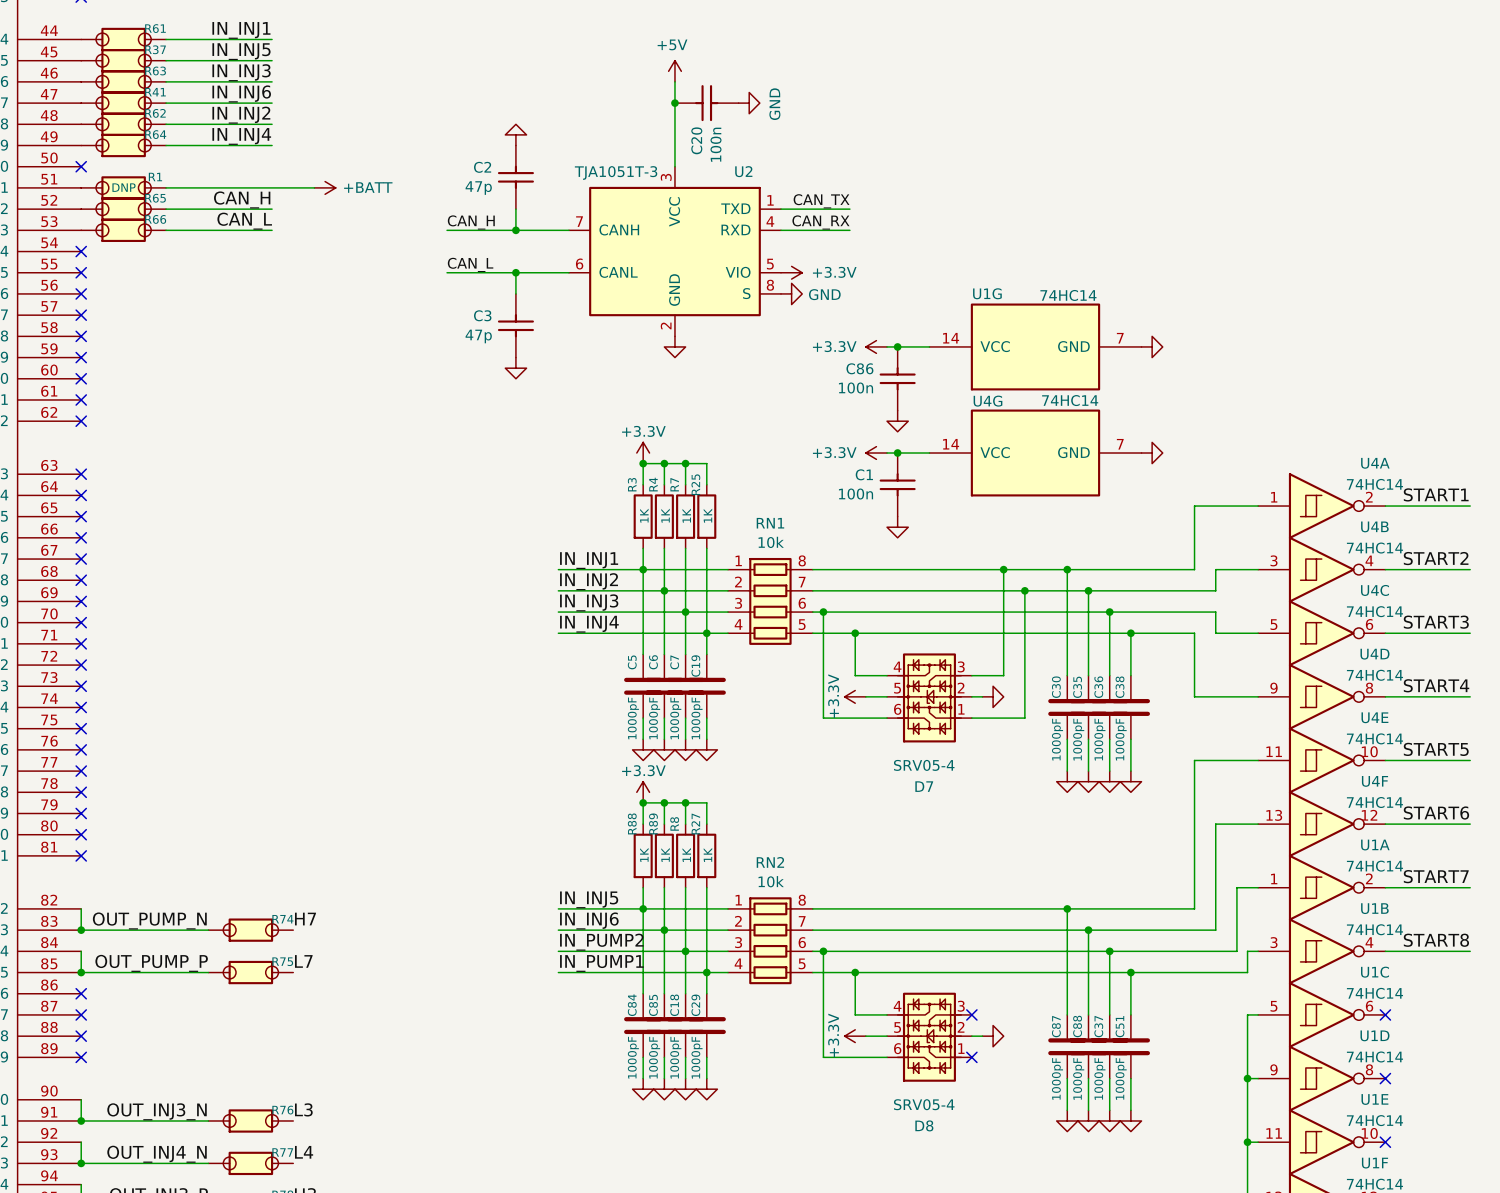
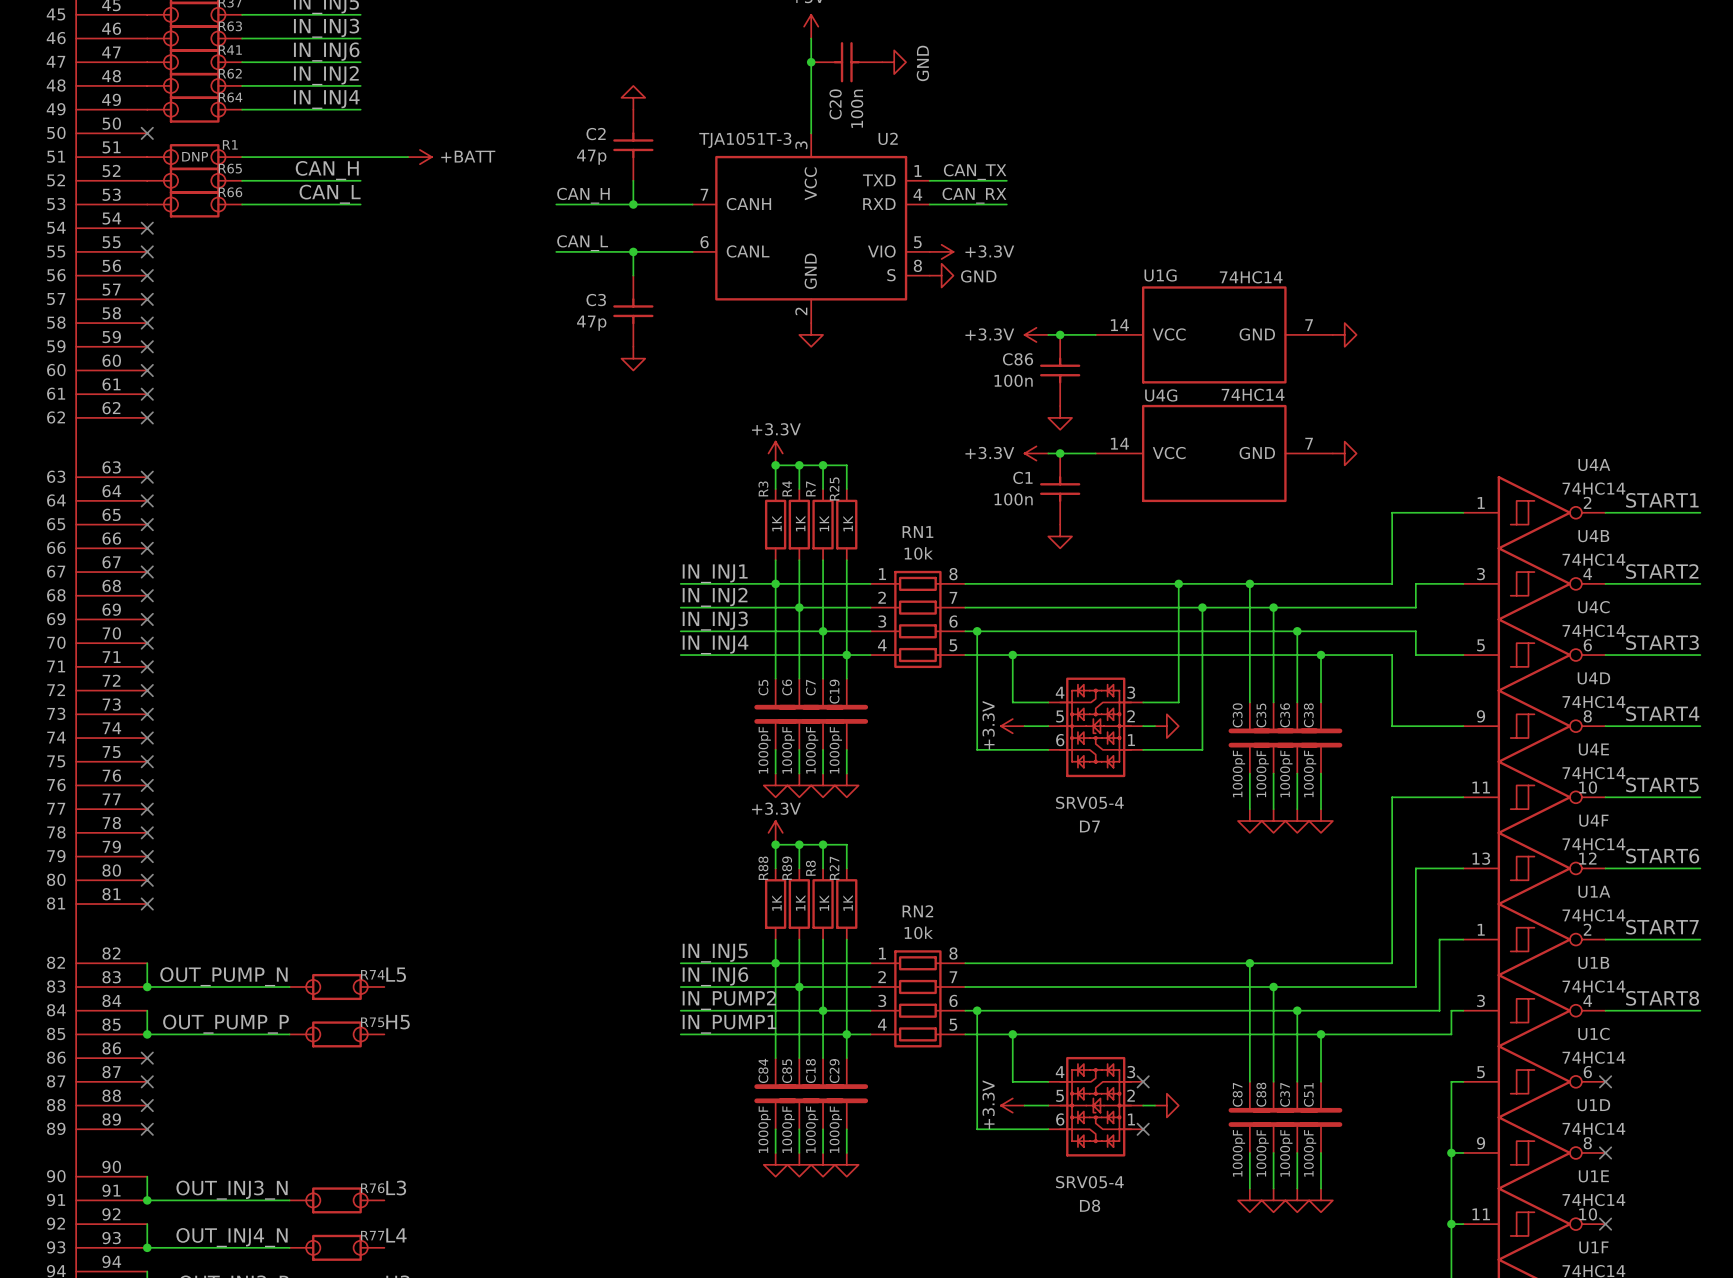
label: H7 (305, 919) -> L5 (396, 974)
label: L7 (303, 961) -> H5 (398, 1022)

